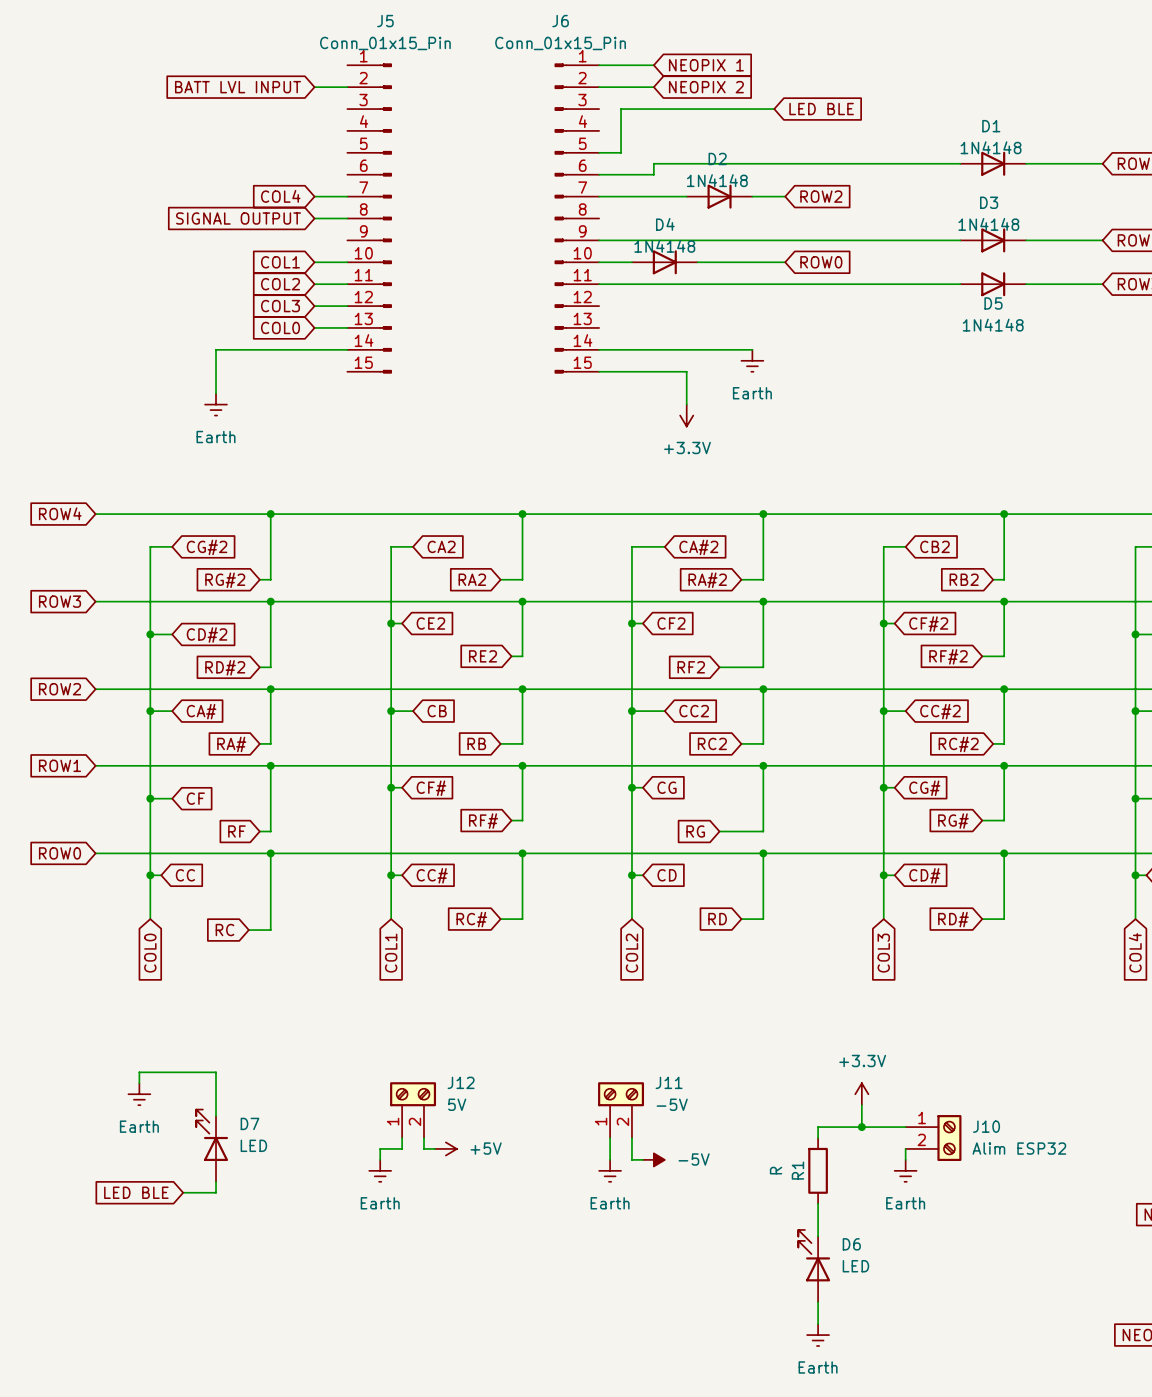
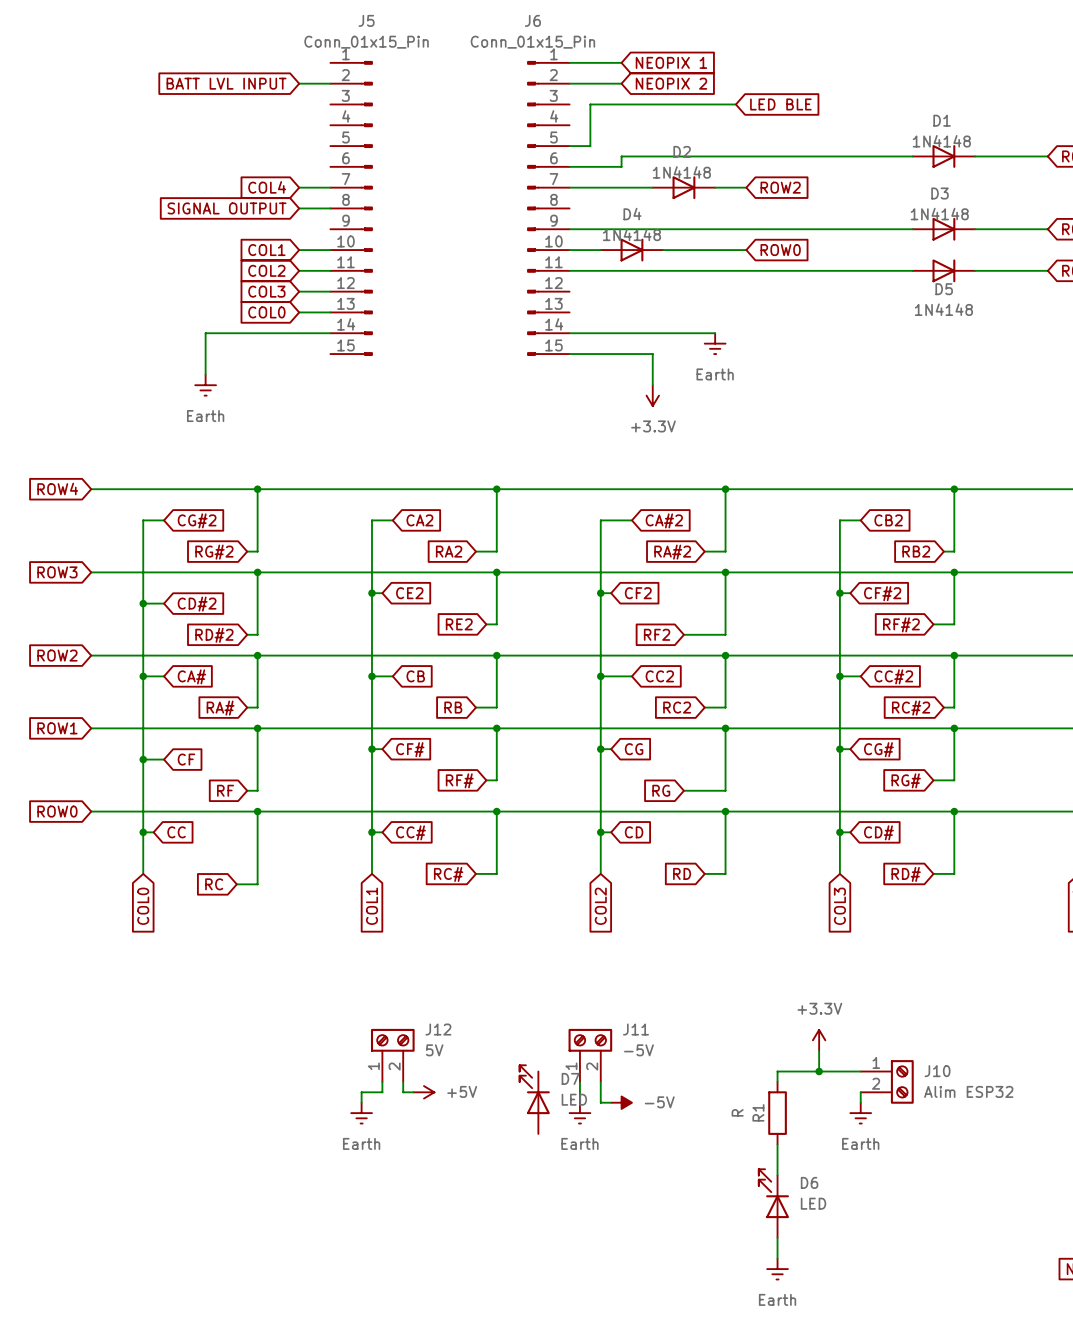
wire: (139, 1083) (139, 1072) (216, 1072) (216, 1116) -> none
power symbol: Earth (139, 1094) -> none
D7 position: (212, 1145) -> (534, 1099)
wire: (216, 1181) (216, 1192) (183, 1192) -> none
global label: LED BLE (136, 1192) -> none

